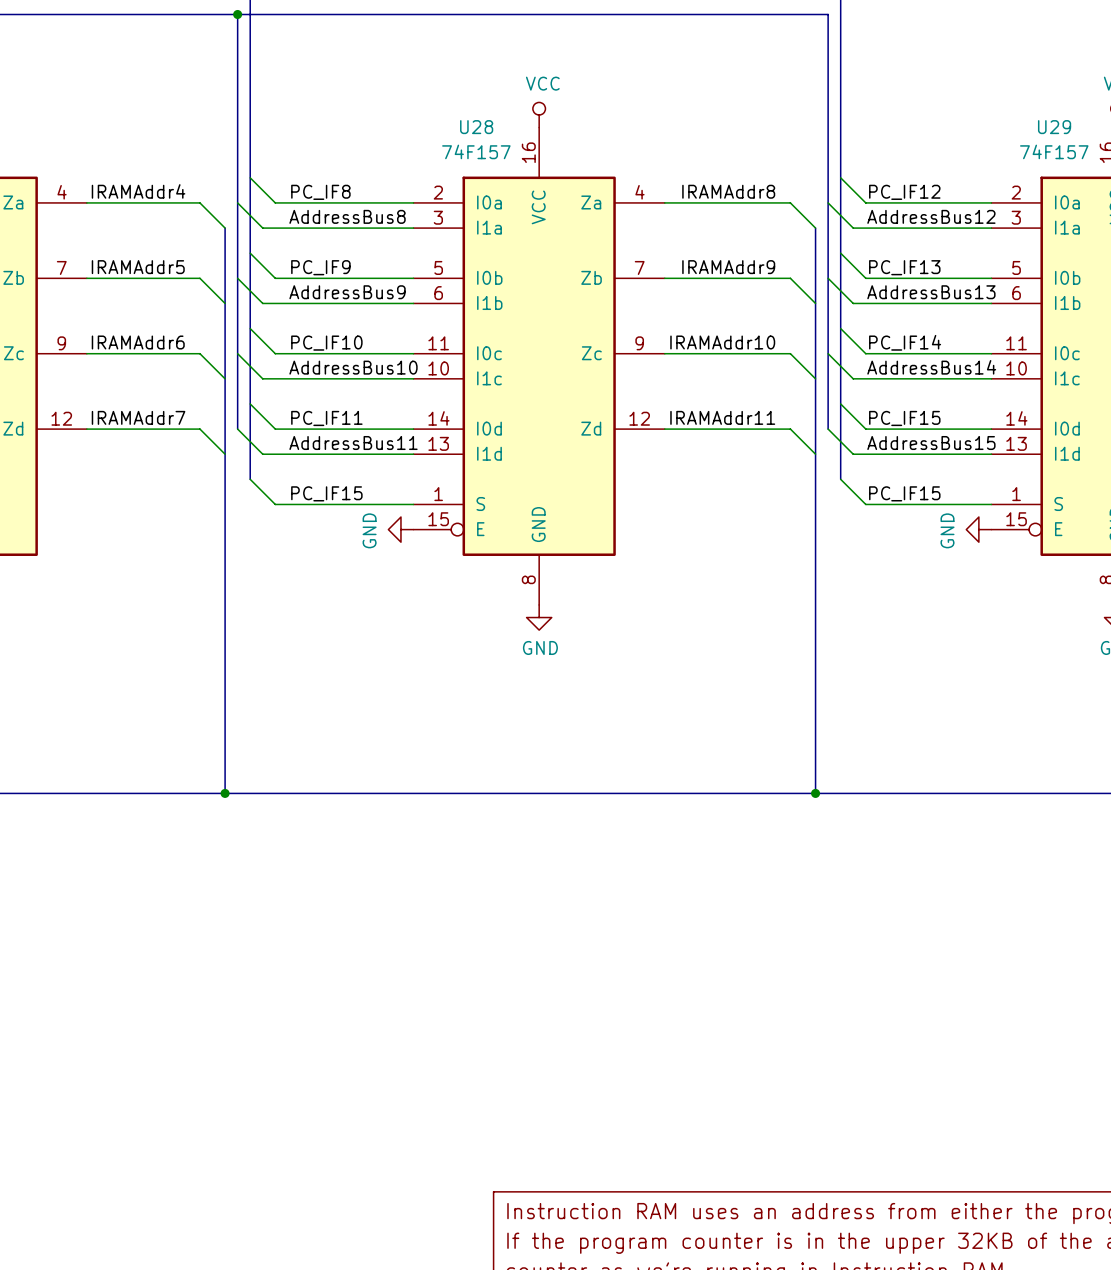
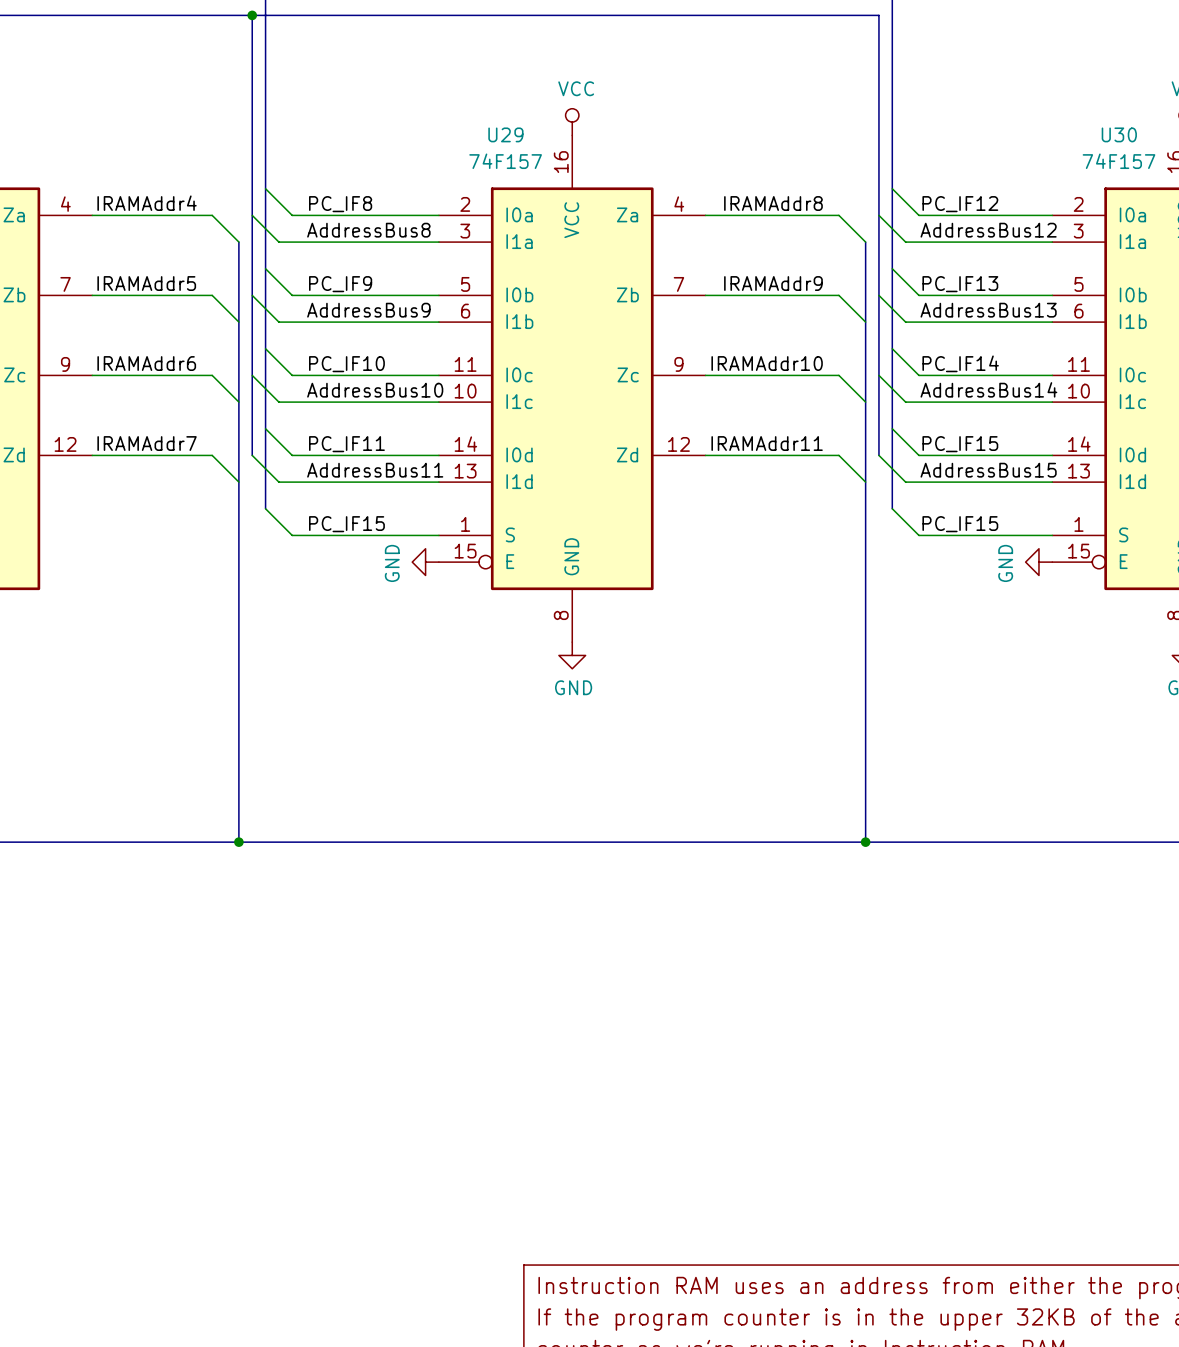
U28 name: U28 (476, 127) -> U29 (505, 134)
U29 name: U29 (1054, 127) -> U30 (1119, 134)

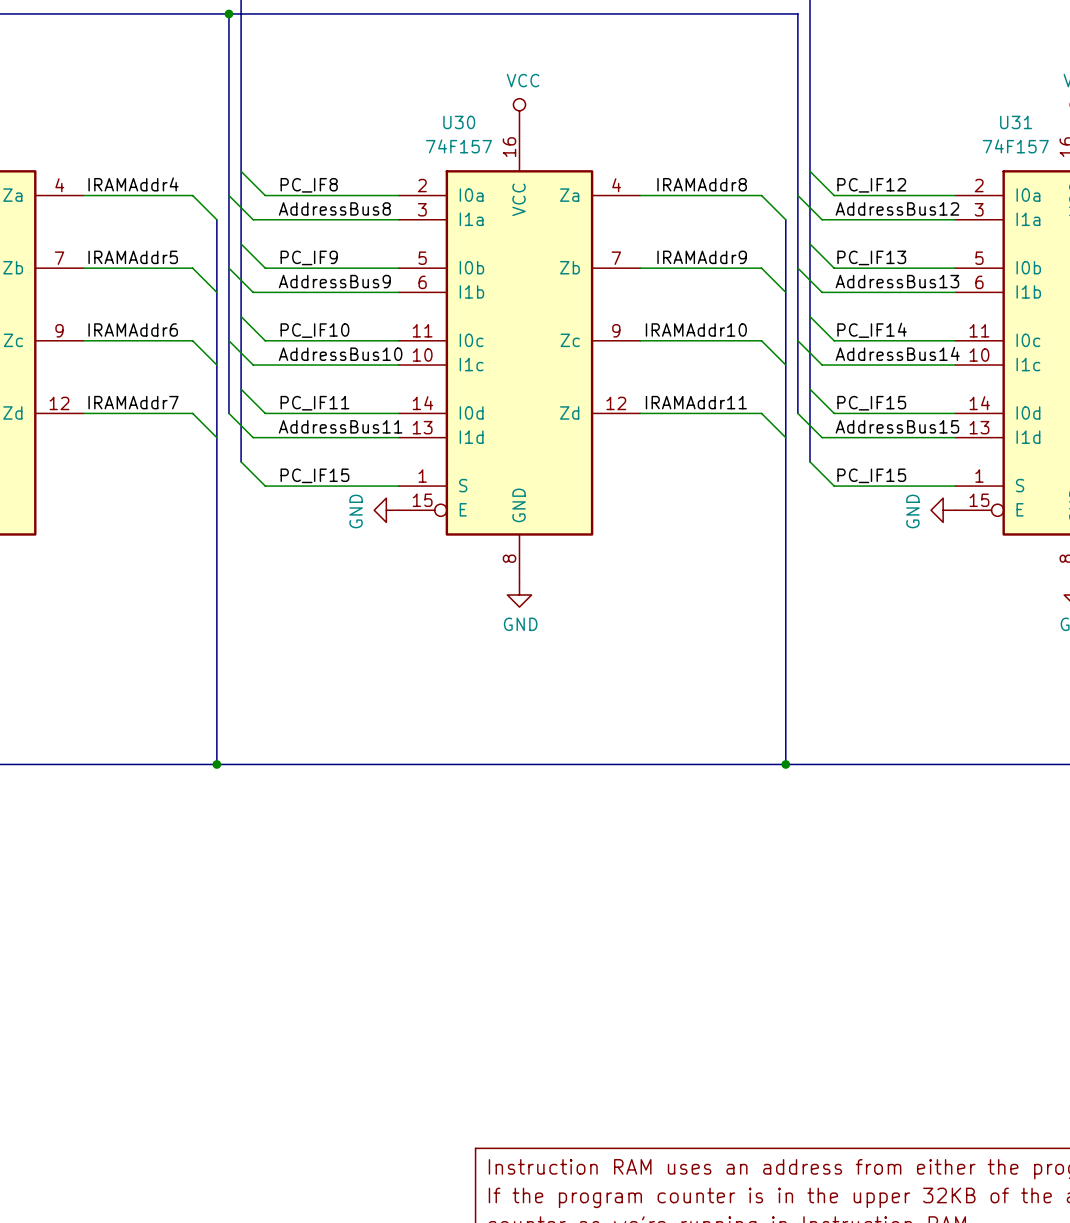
U29 name: U29 (505, 134) -> U30 (459, 122)
U30 name: U30 (1119, 134) -> U31 (1016, 122)

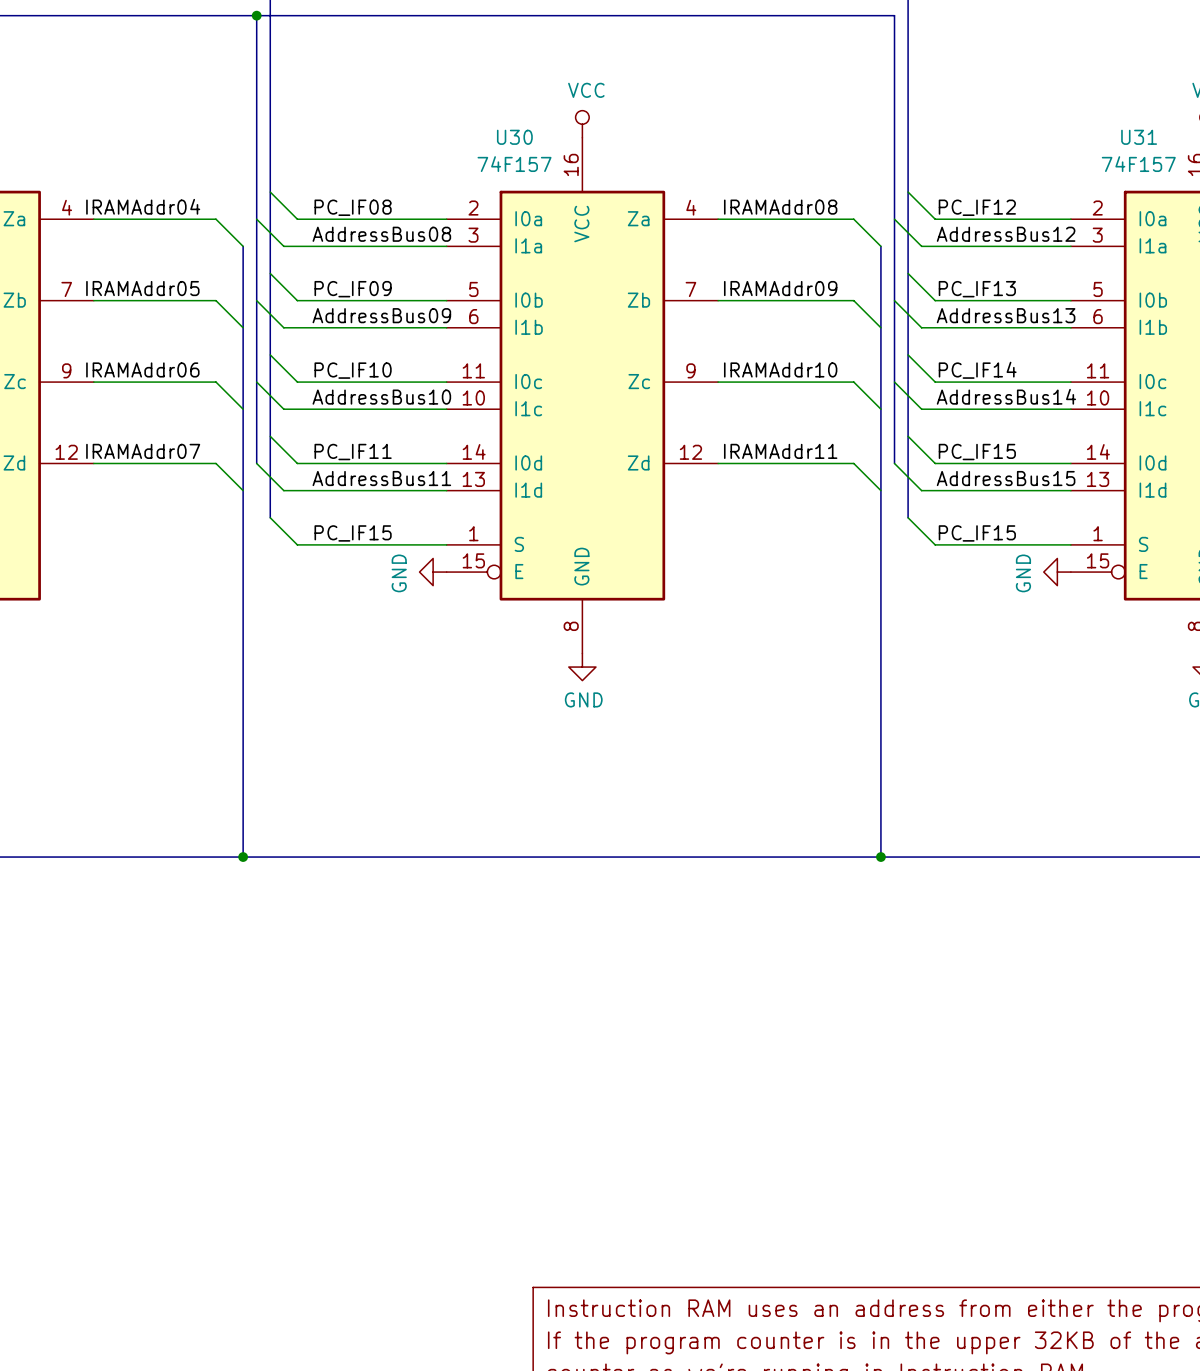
label: IRAMAddr4 (133, 184) -> IRAMAddr04 (143, 206)
label: IRAMAddr8 (702, 184) -> IRAMAddr08 (780, 207)
label: PC_IF8 (309, 185) -> PC_IF08 (353, 207)
label: AddressBus8 (334, 208) -> AddressBus08 (381, 234)
label: IRAMAddr5 (133, 257) -> IRAMAddr05 (142, 288)
label: PC_IF9 (309, 257) -> PC_IF09 (353, 289)
label: IRAMAddr9 (702, 257) -> IRAMAddr09 (780, 288)
label: AddressBus9 (334, 281) -> AddressBus09 (381, 315)
label: IRAMAddr6 (133, 329) -> IRAMAddr06 (142, 369)
label: IRAMAddr7 (133, 402) -> IRAMAddr07 (143, 451)

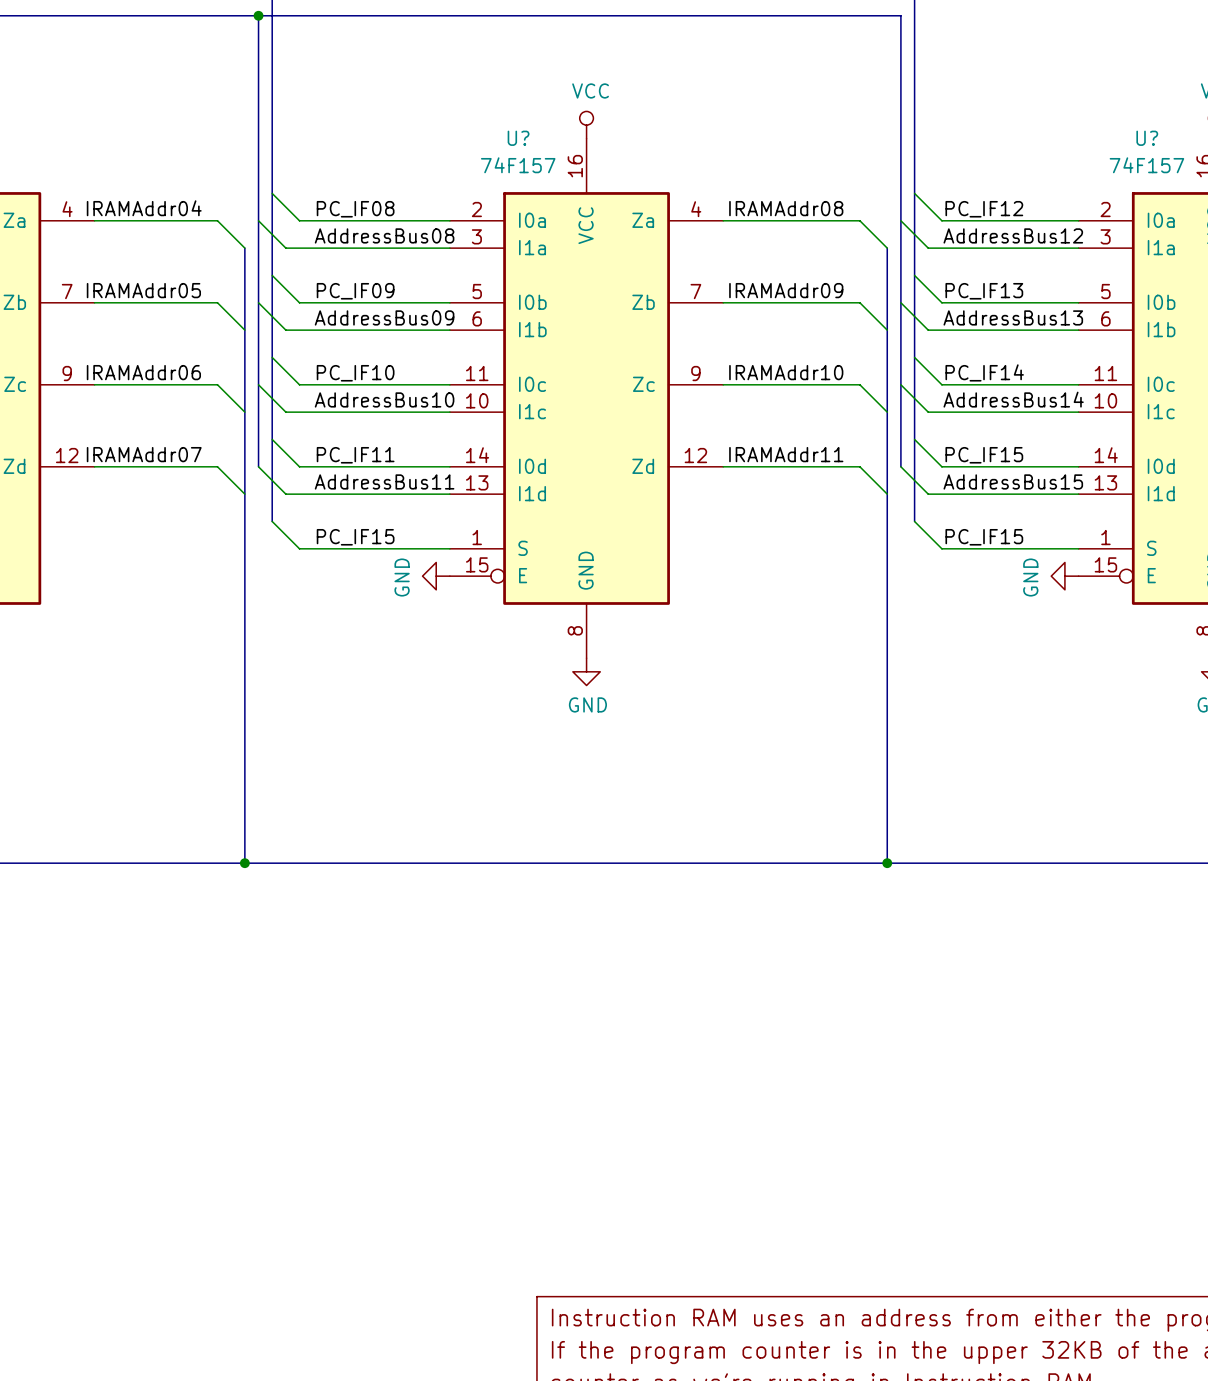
U30 name: U30 (514, 137) -> U? (518, 138)
U31 name: U31 (1139, 137) -> U? (1147, 138)

